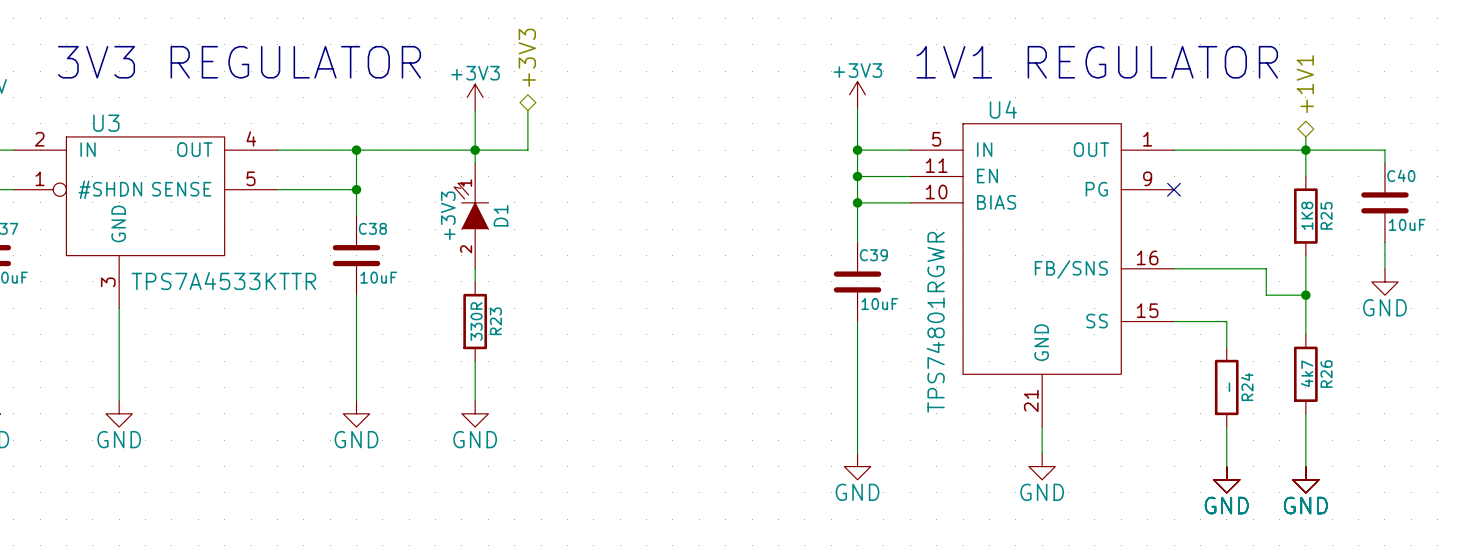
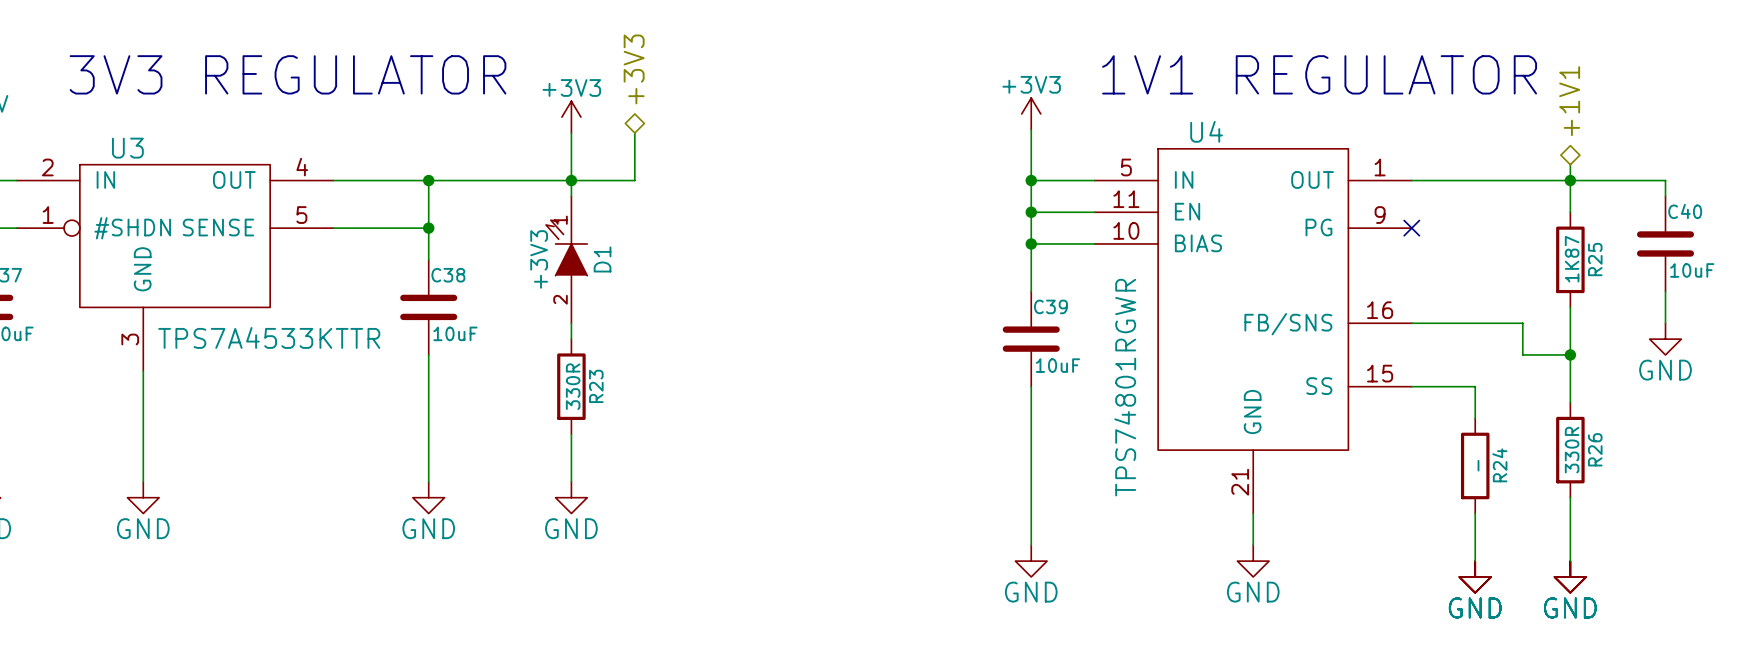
R25 value: 1K8 (1307, 215) -> 1K87 (1572, 259)
R26 value: 4k7 (1307, 373) -> 330R (1572, 450)

